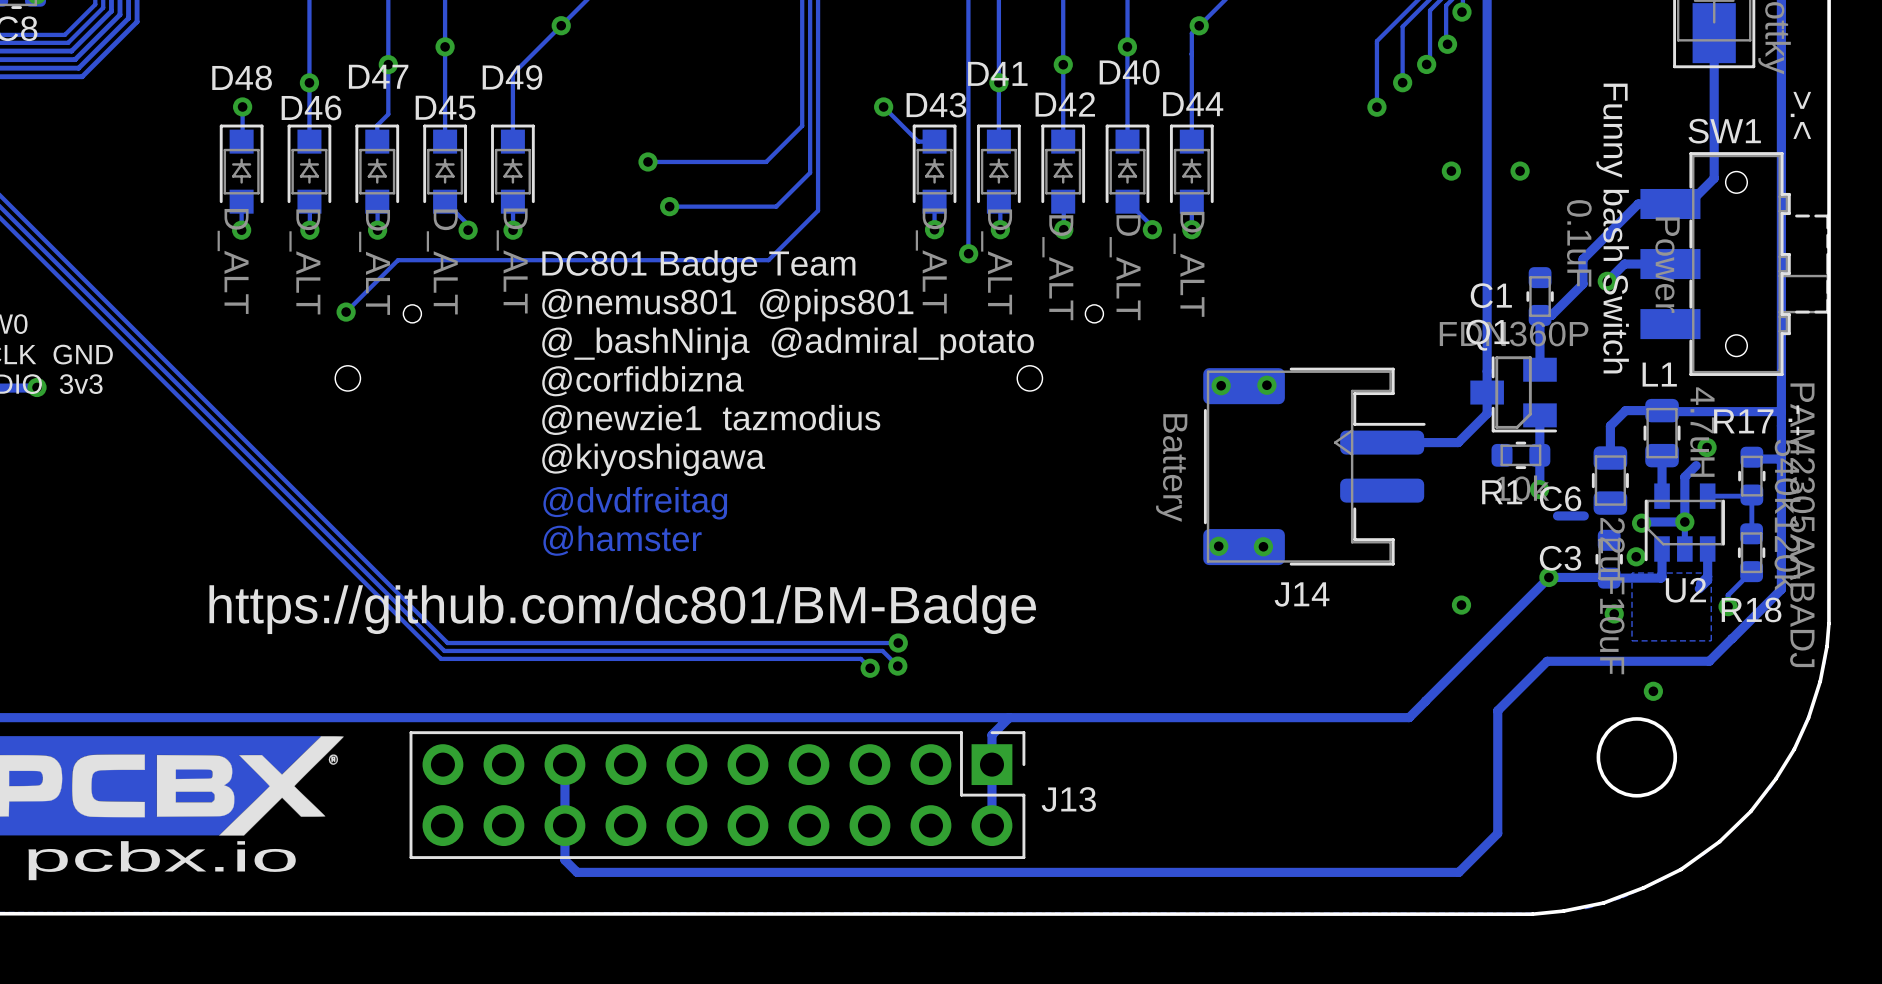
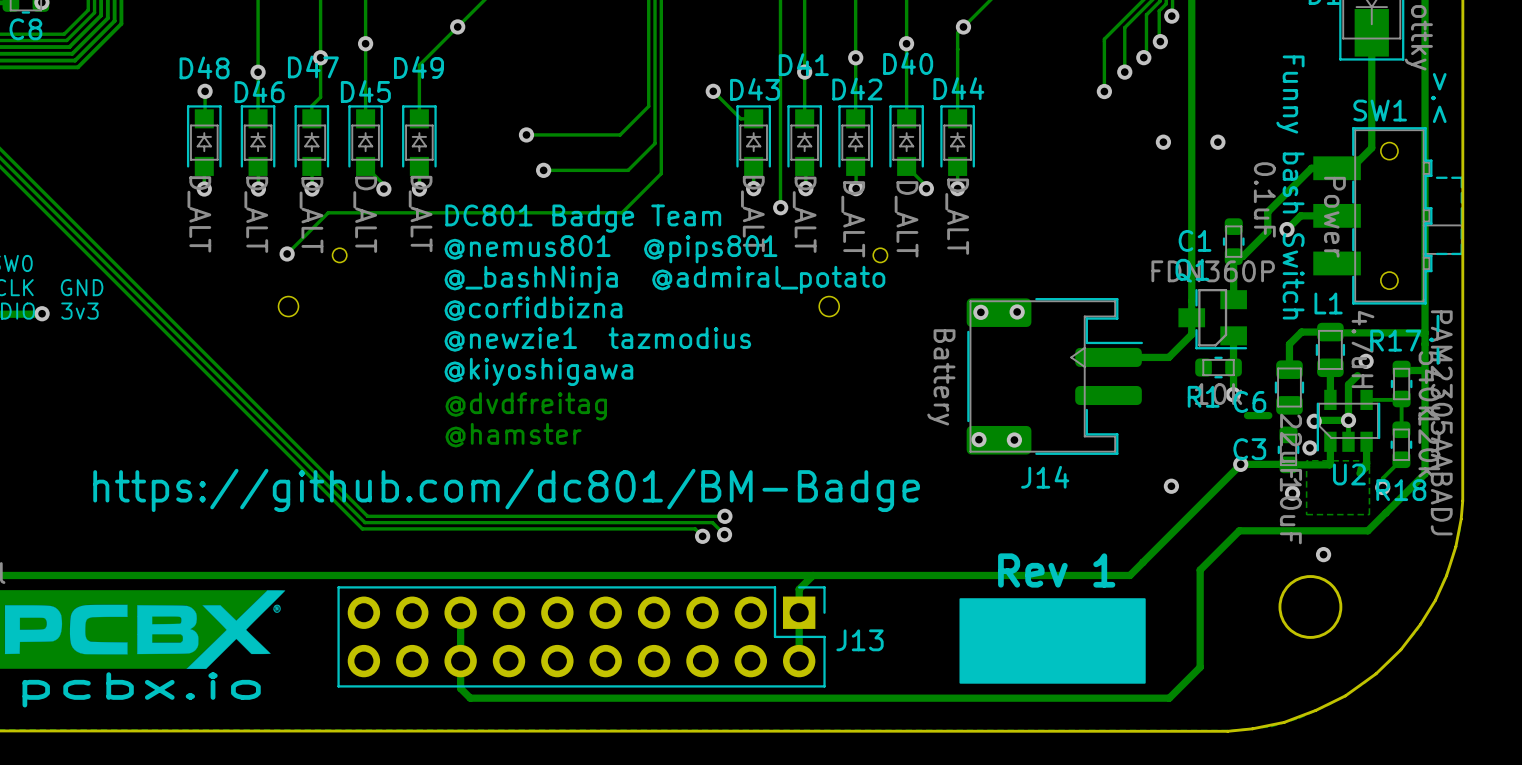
text: none -> Rev 1 (1056, 570)
drawing: none -> [959, 598, 1146, 684]

